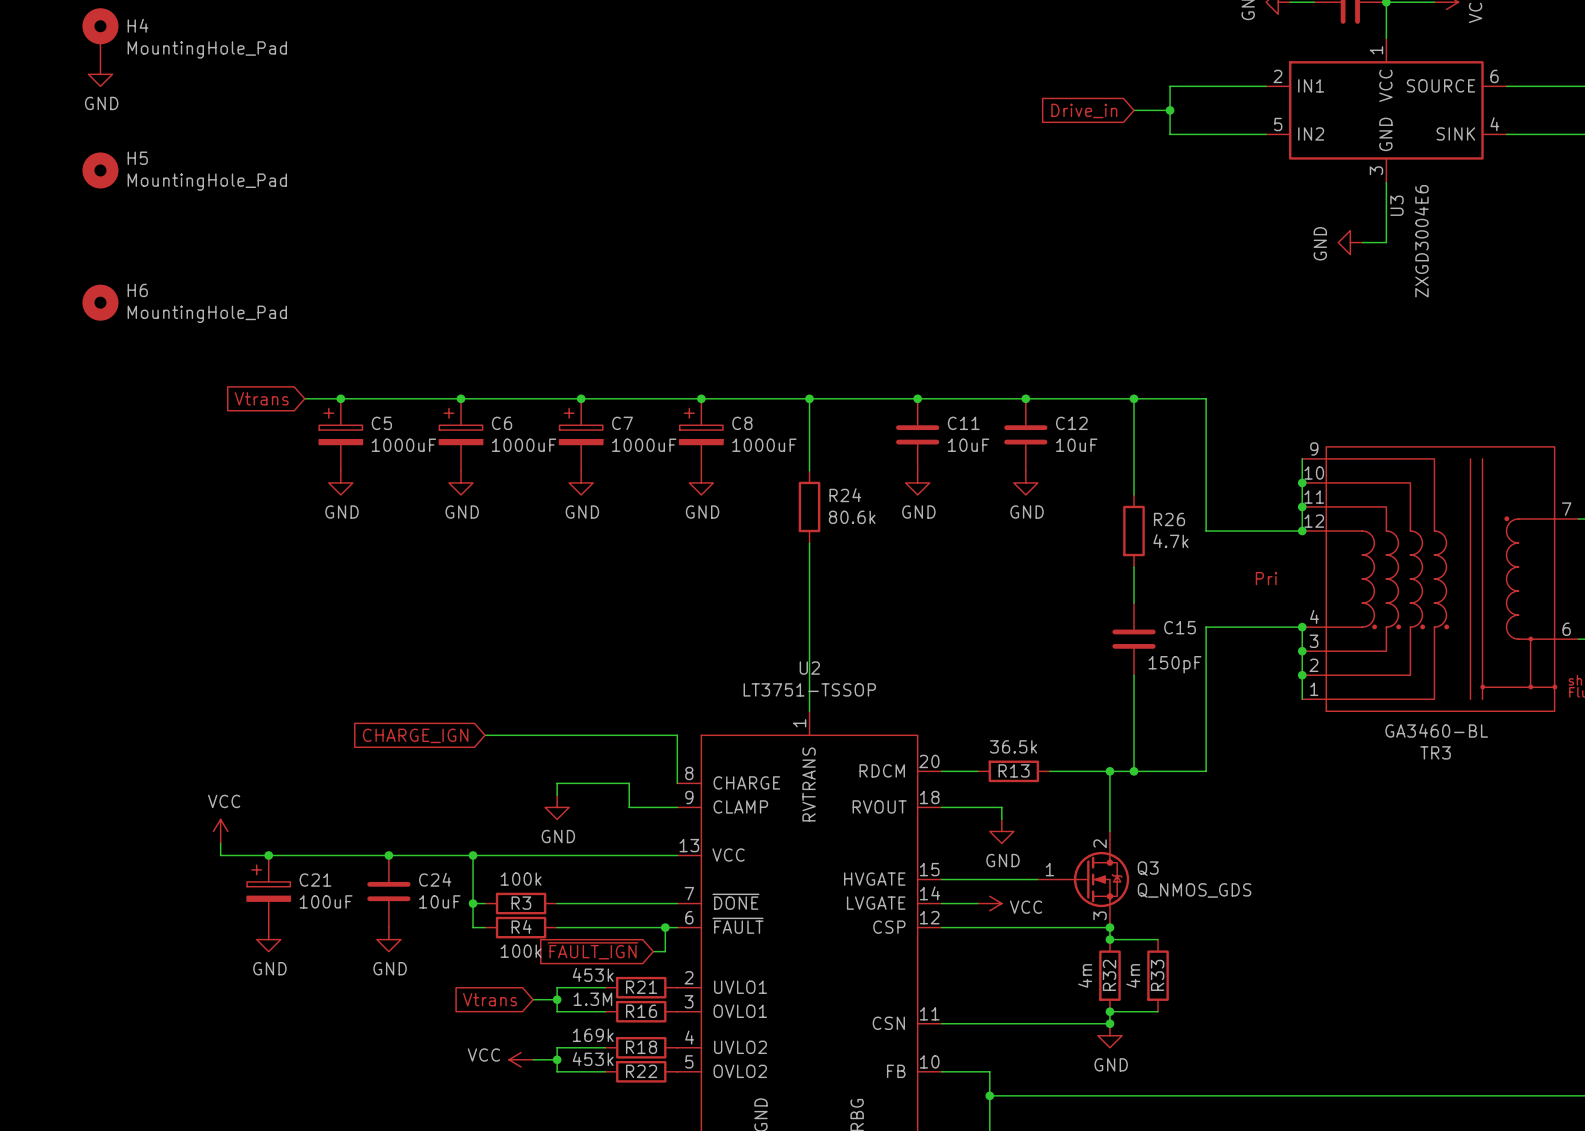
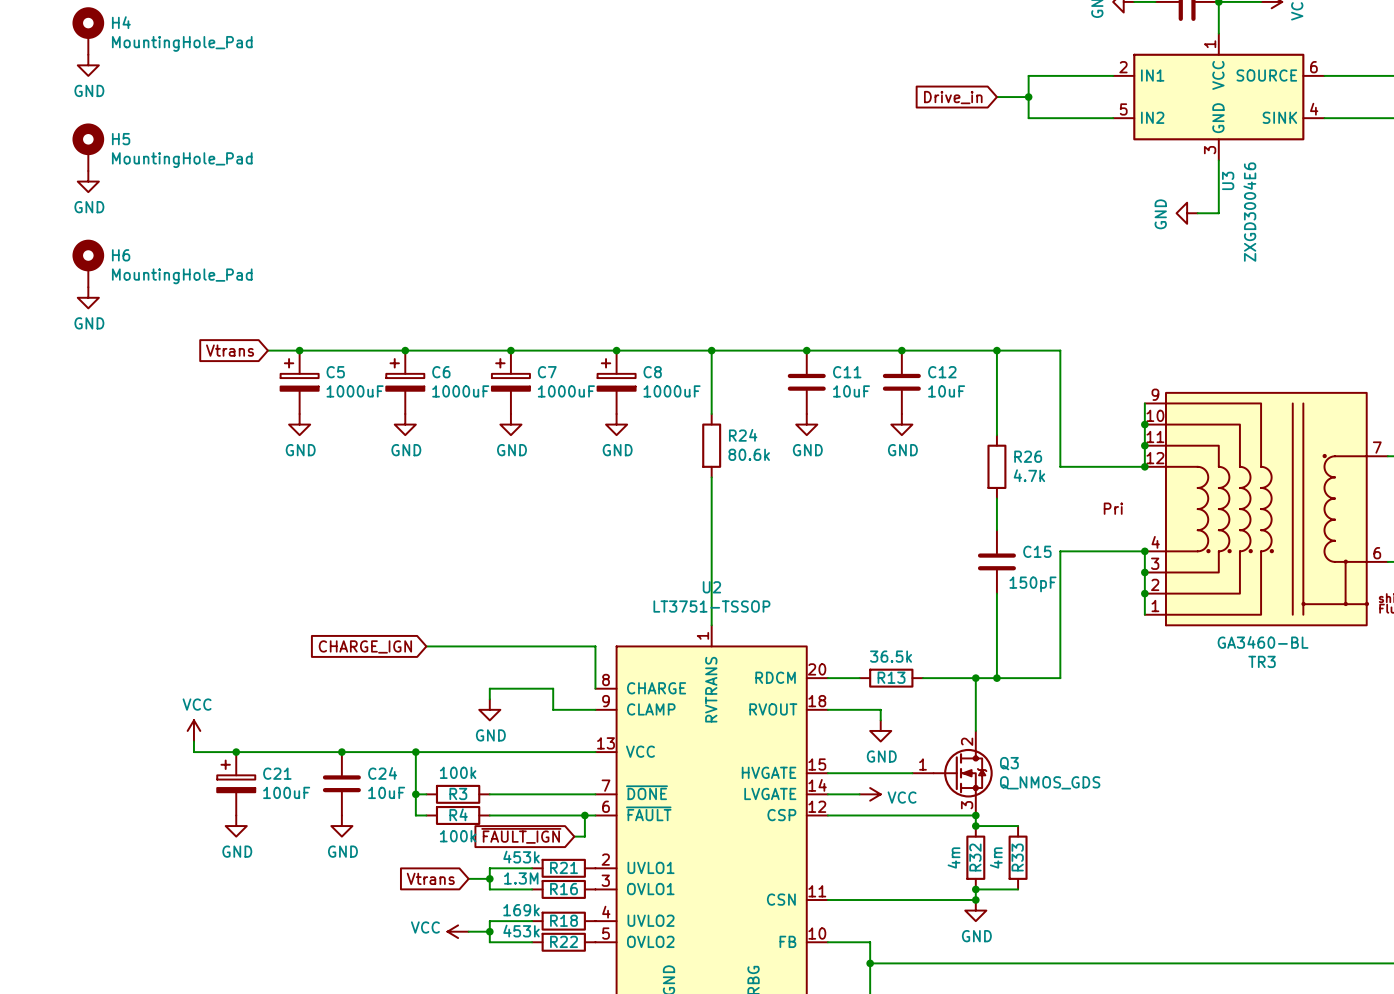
H5 symbol: [82, 152, 119, 189] -> [72, 123, 105, 172]
power symbol: none -> GND (88, 181)
H6 symbol: [82, 284, 119, 321] -> [72, 239, 105, 288]
power symbol: none -> GND (88, 297)

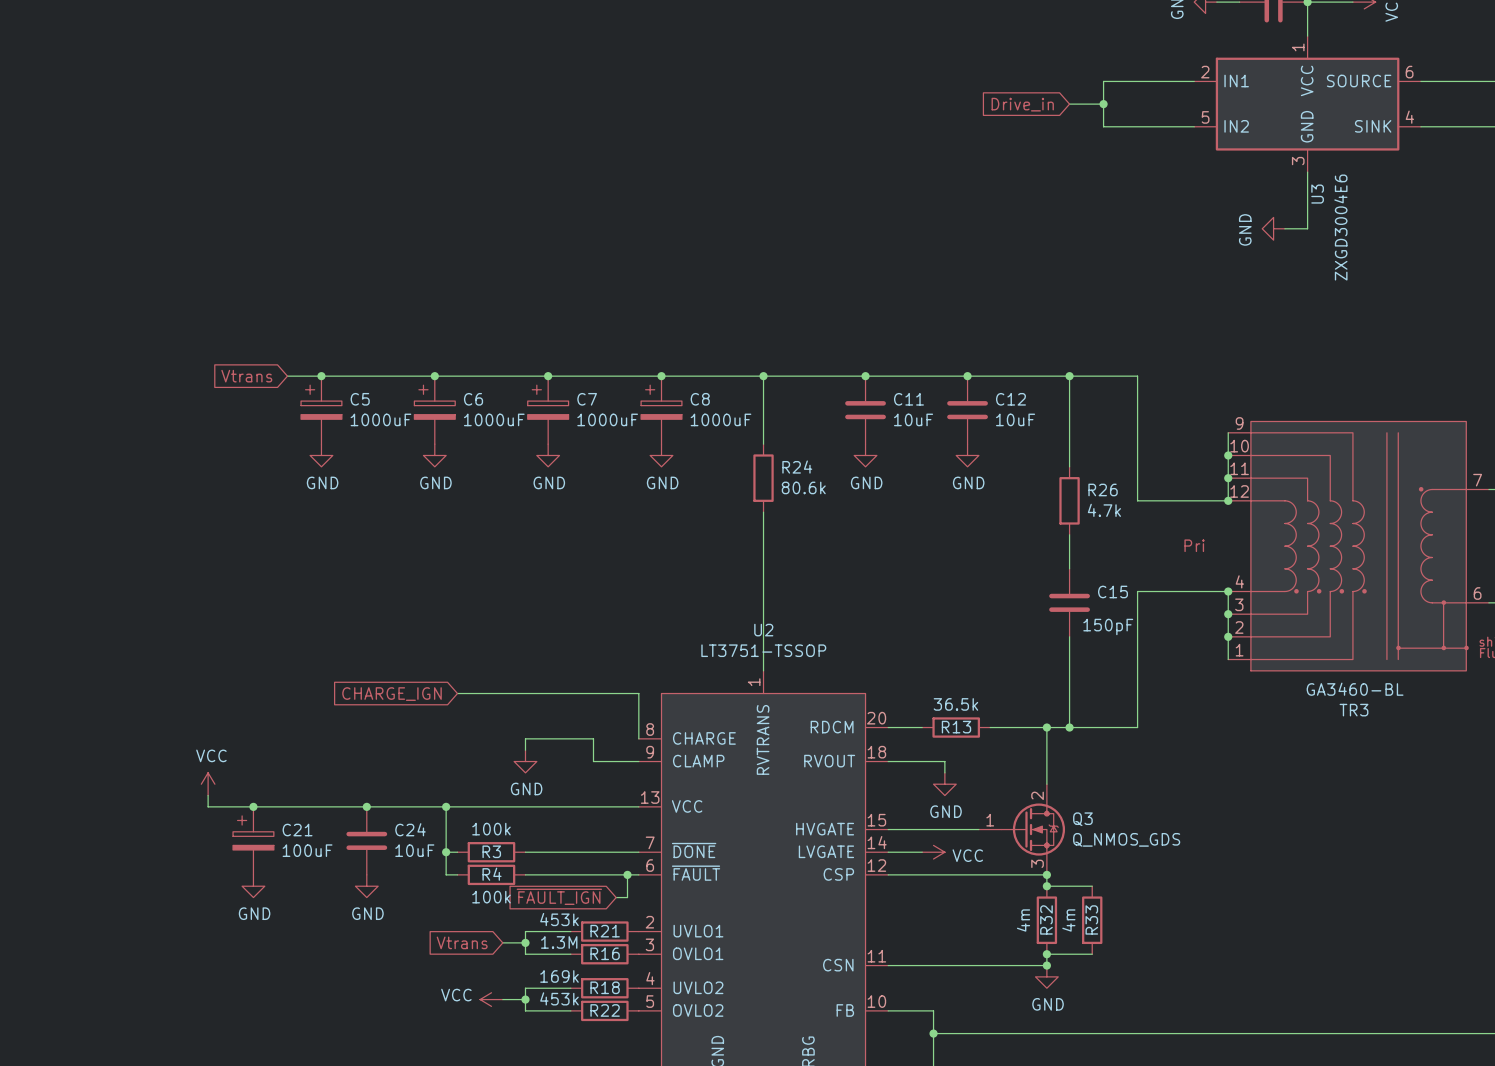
H4: MountingHole_Pad (88, 31) -> none
power symbol: GND (88, 65) -> none
H5: MountingHole_Pad (88, 147) -> none
power symbol: GND (88, 181) -> none
H6: MountingHole_Pad (88, 263) -> none
power symbol: GND (88, 297) -> none

